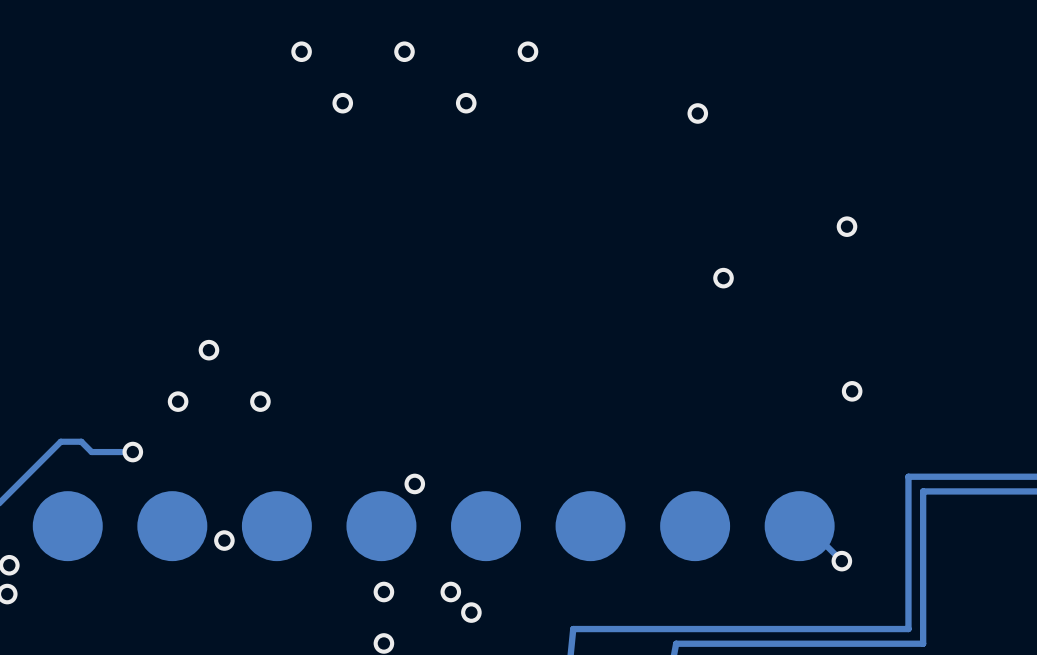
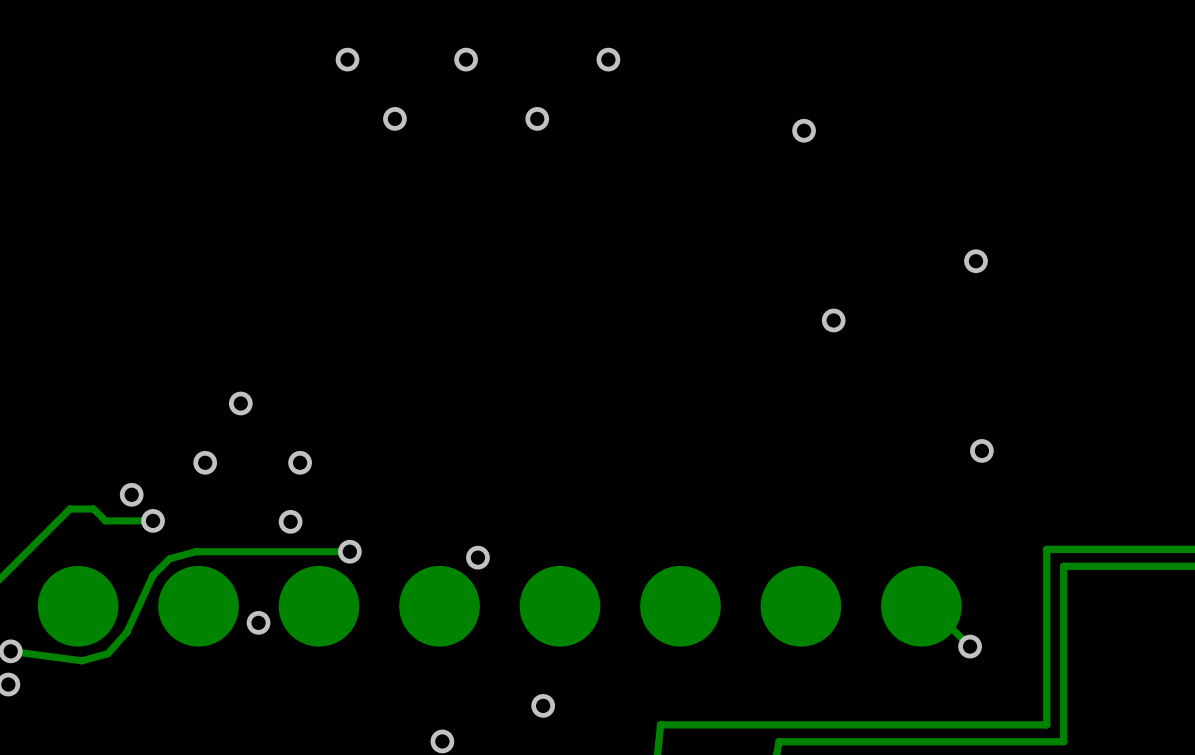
via: none -> (131, 494)
via: none -> (290, 521)
track: none -> (349, 551) (195, 551) (169, 558) (153, 575) (126, 632) (107, 653) (81, 660) (10, 651)
via: none -> (349, 551)
via: (383, 592) -> none
via: (450, 592) -> none

